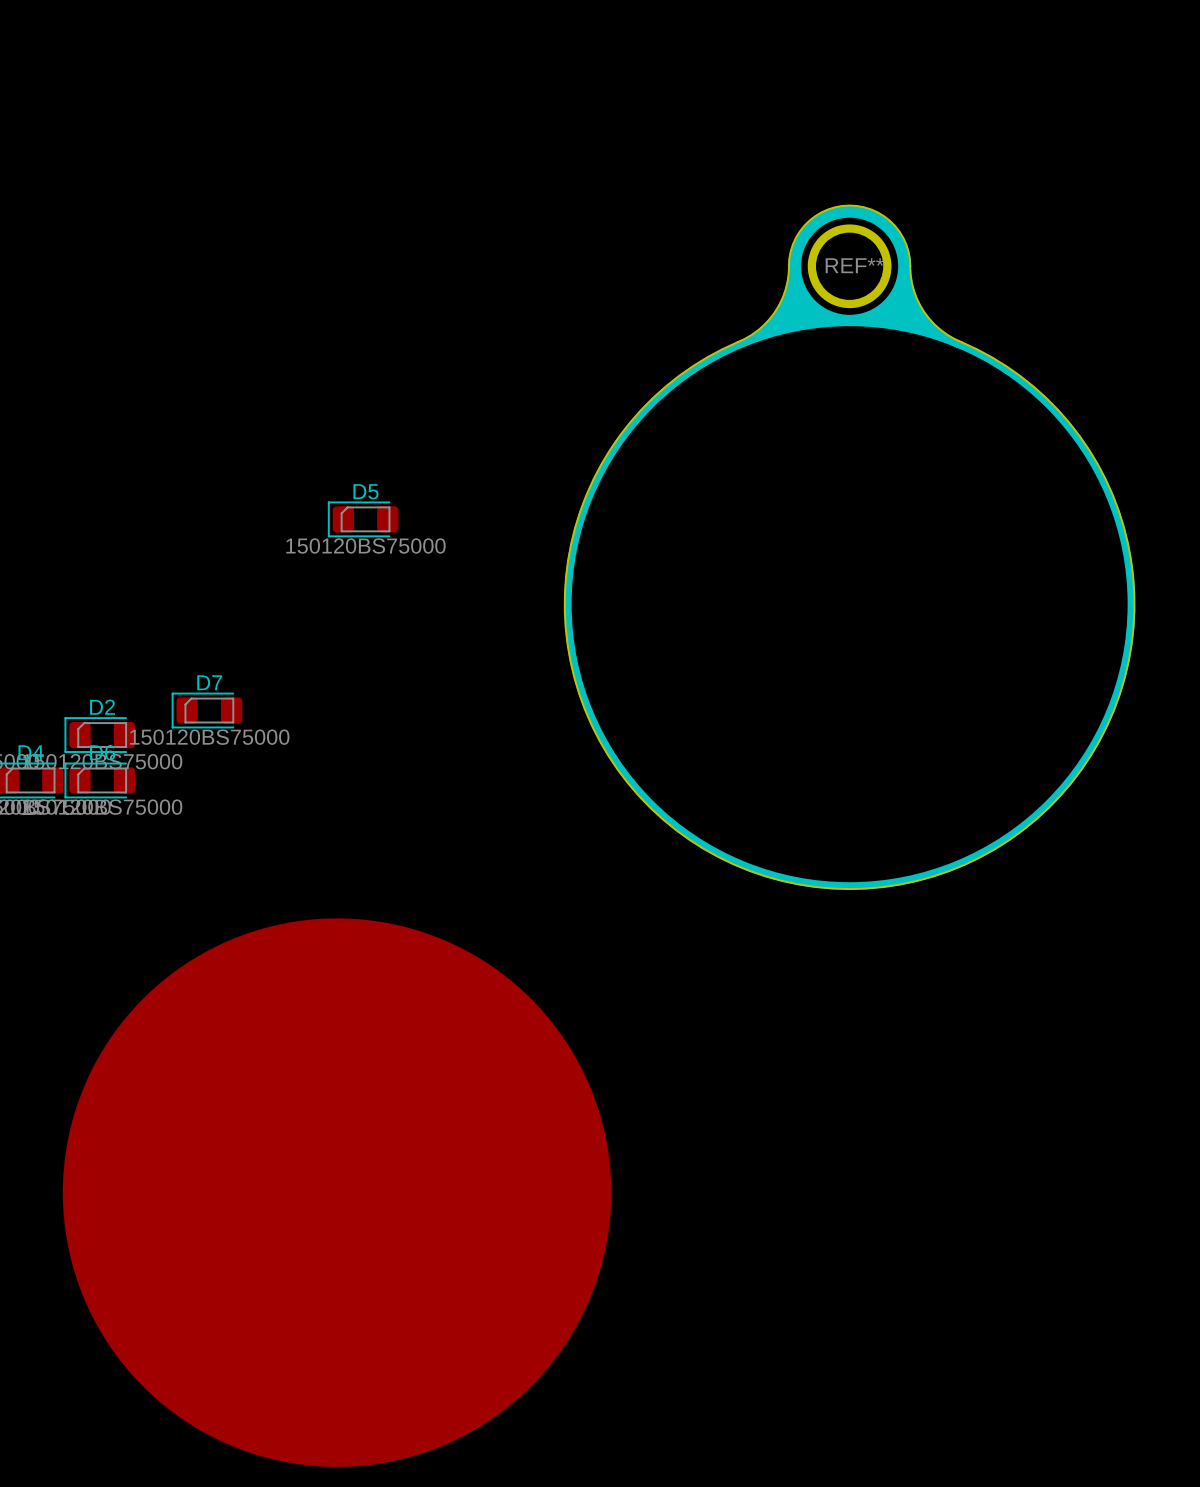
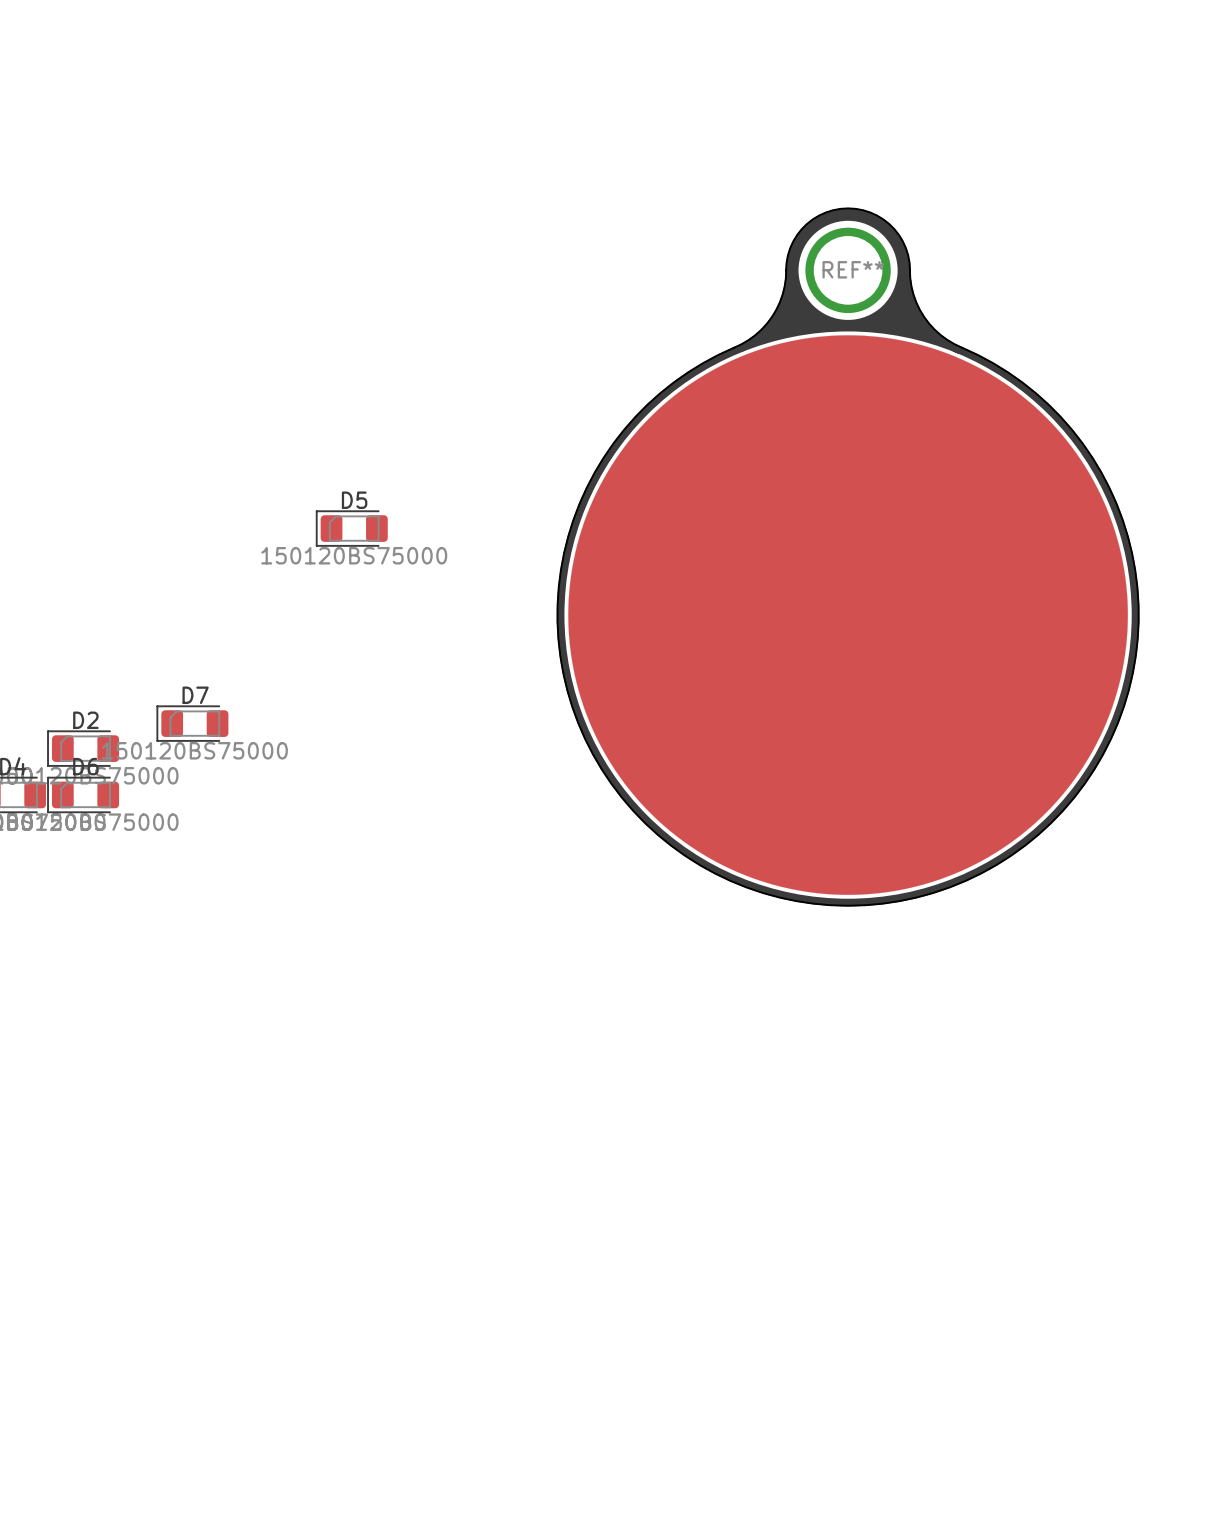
drawing: none -> [568, 335, 1128, 895]
drawing: [62, 918, 612, 1467] -> none

